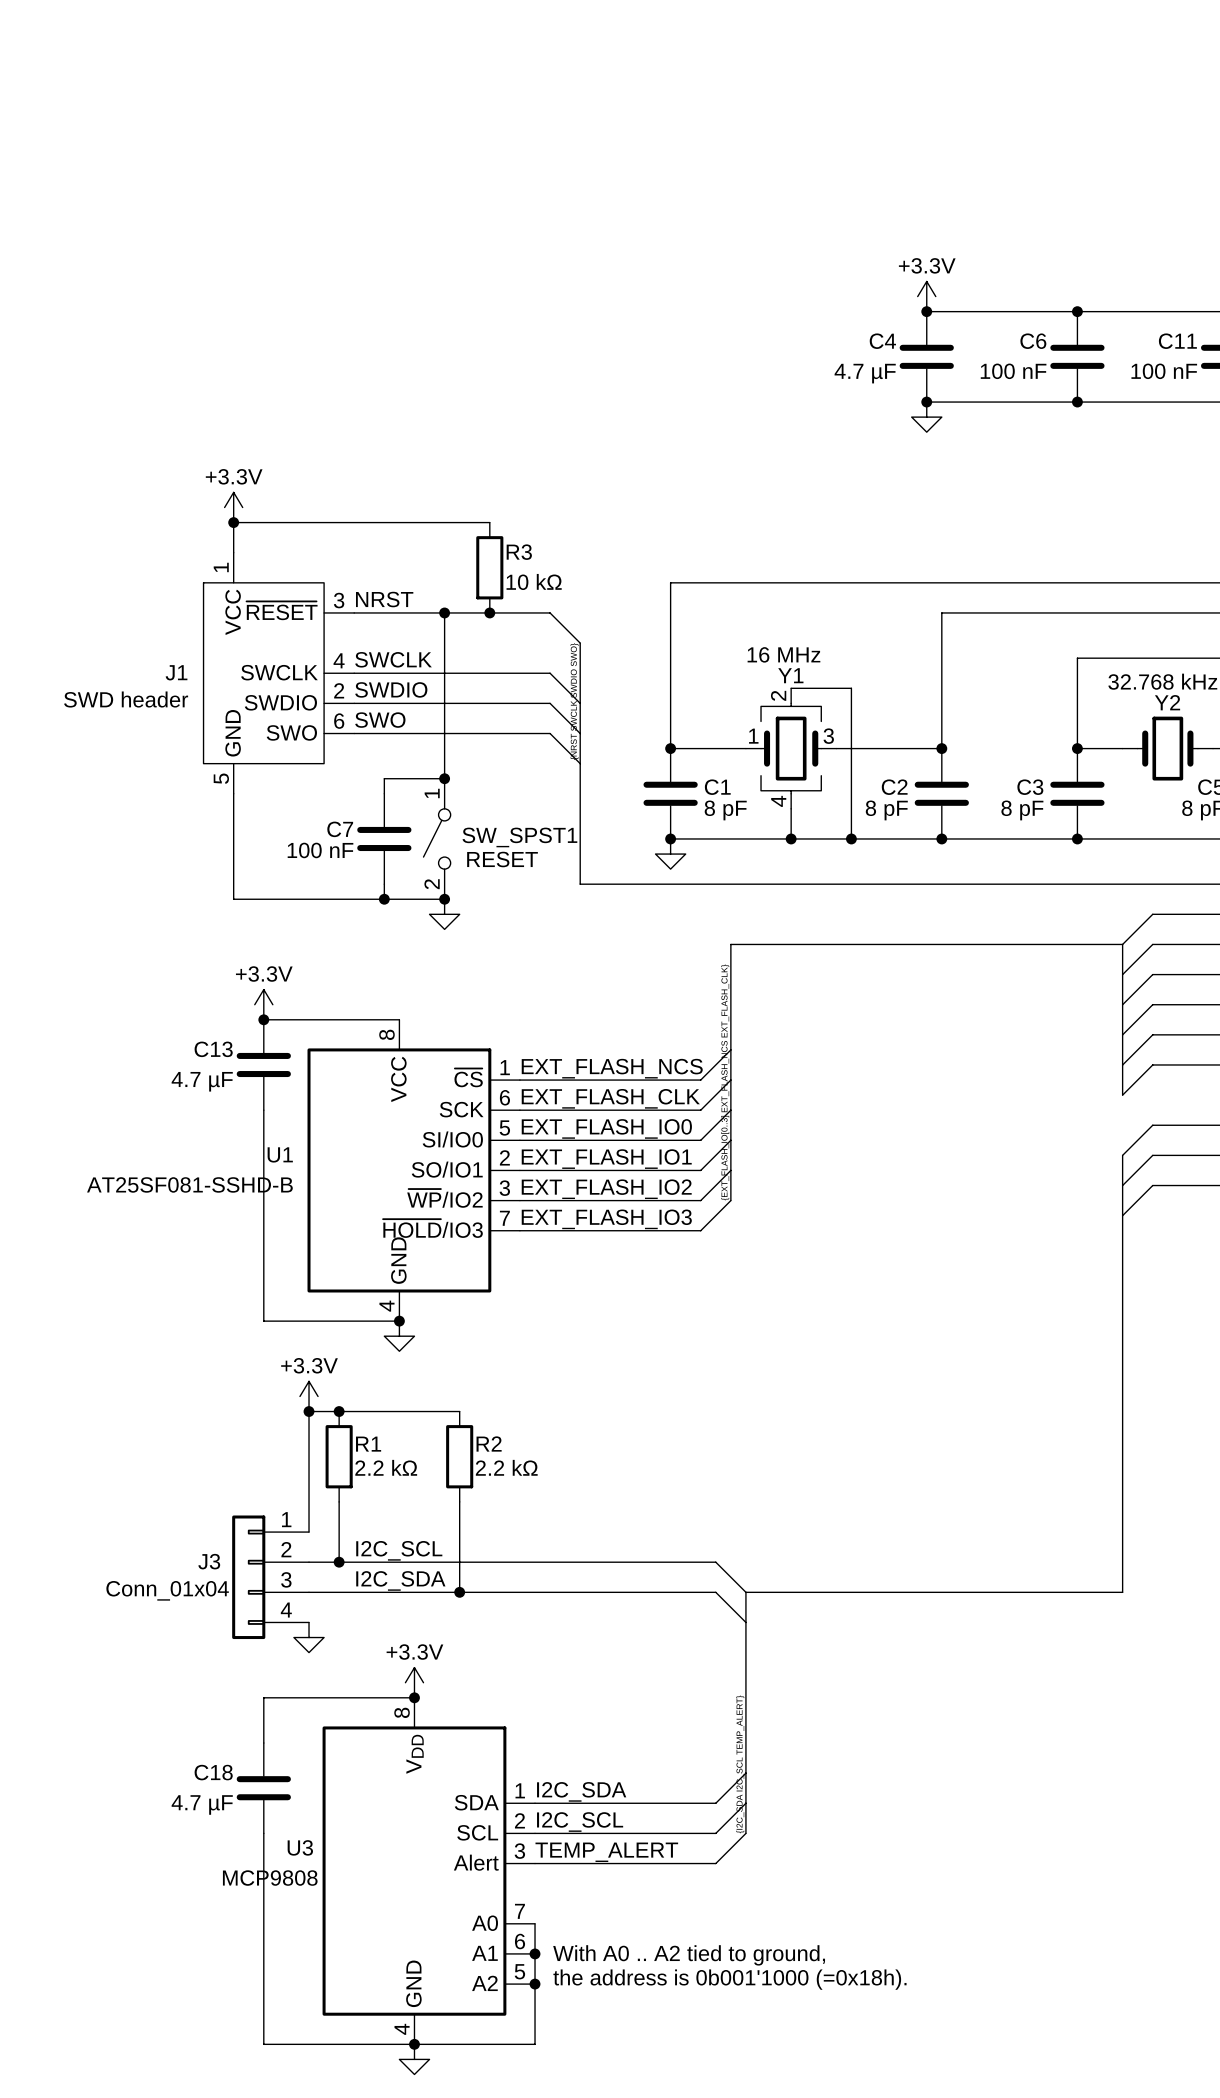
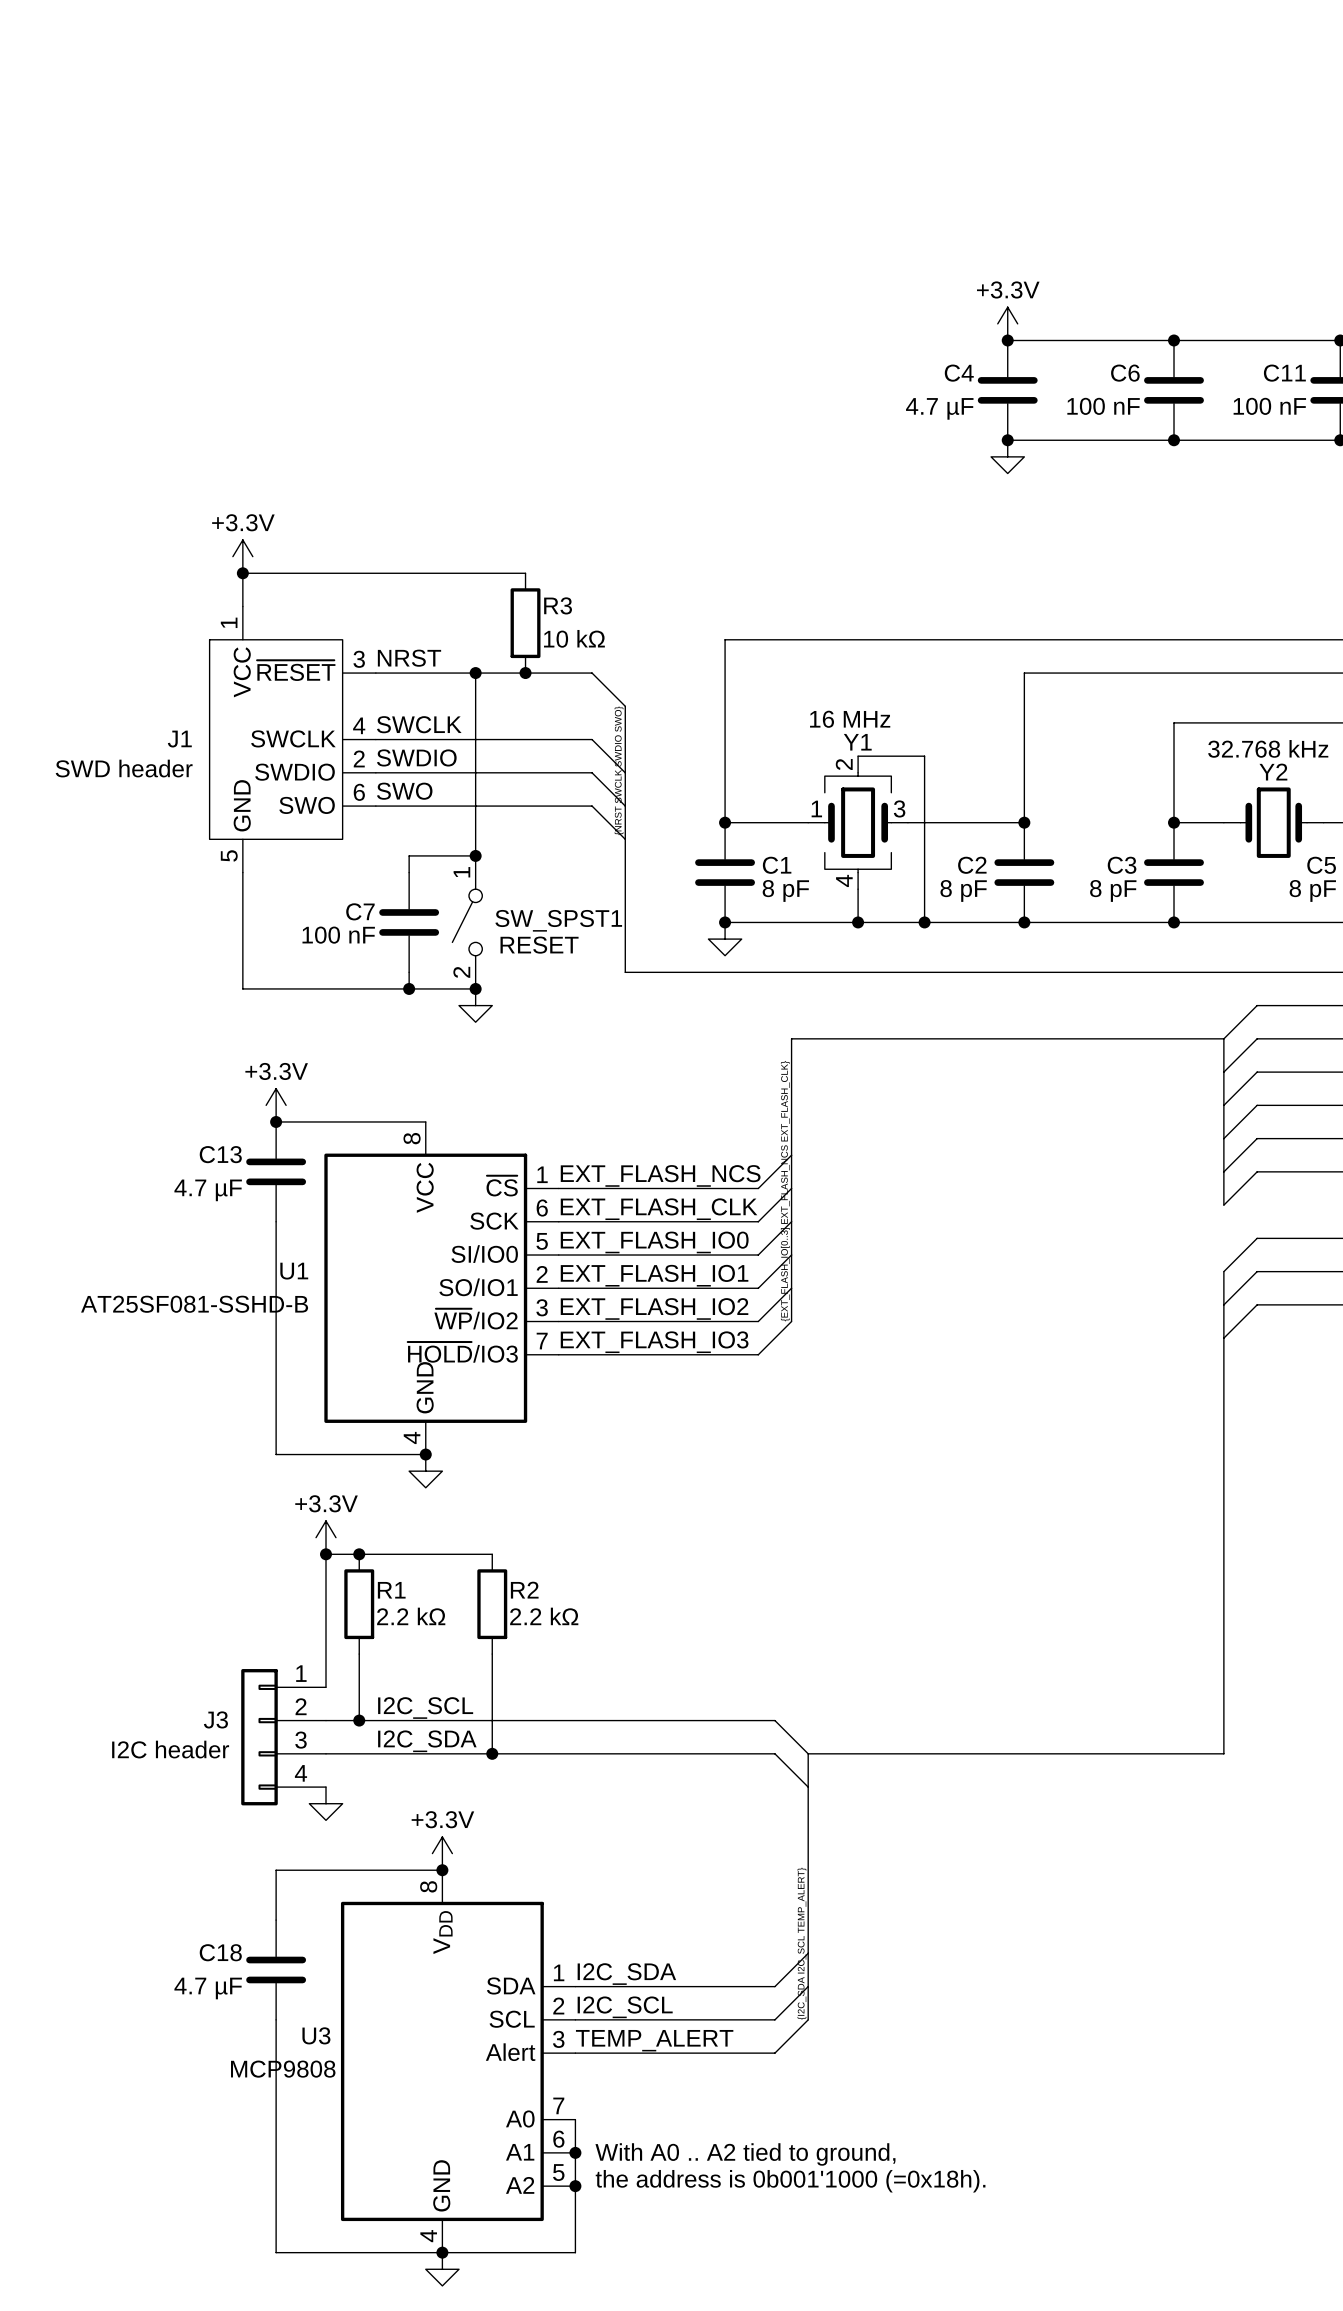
J3 value: Conn_01x04 (167, 1590) -> I2C header (170, 1749)

